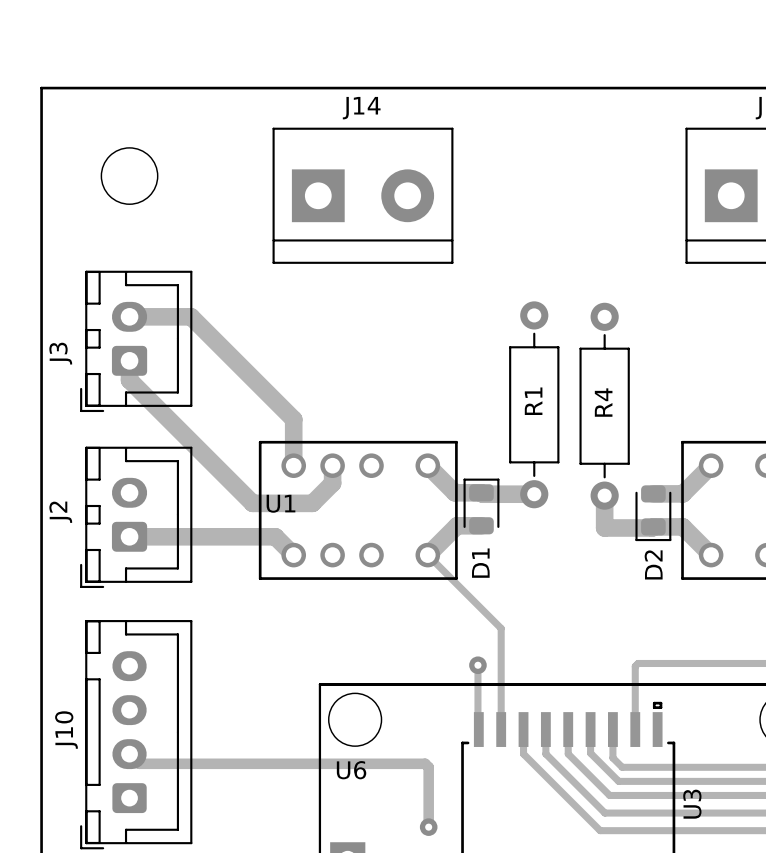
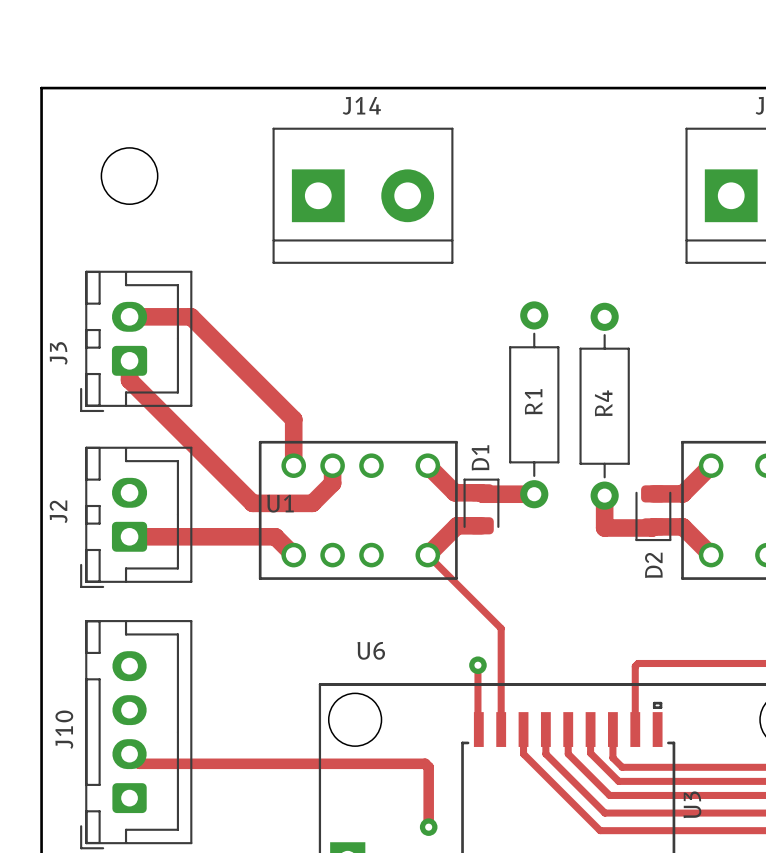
D1 name position: D1 (480, 563) -> D1 (480, 457)
U6 name position: U6 (351, 770) -> U6 (371, 650)

